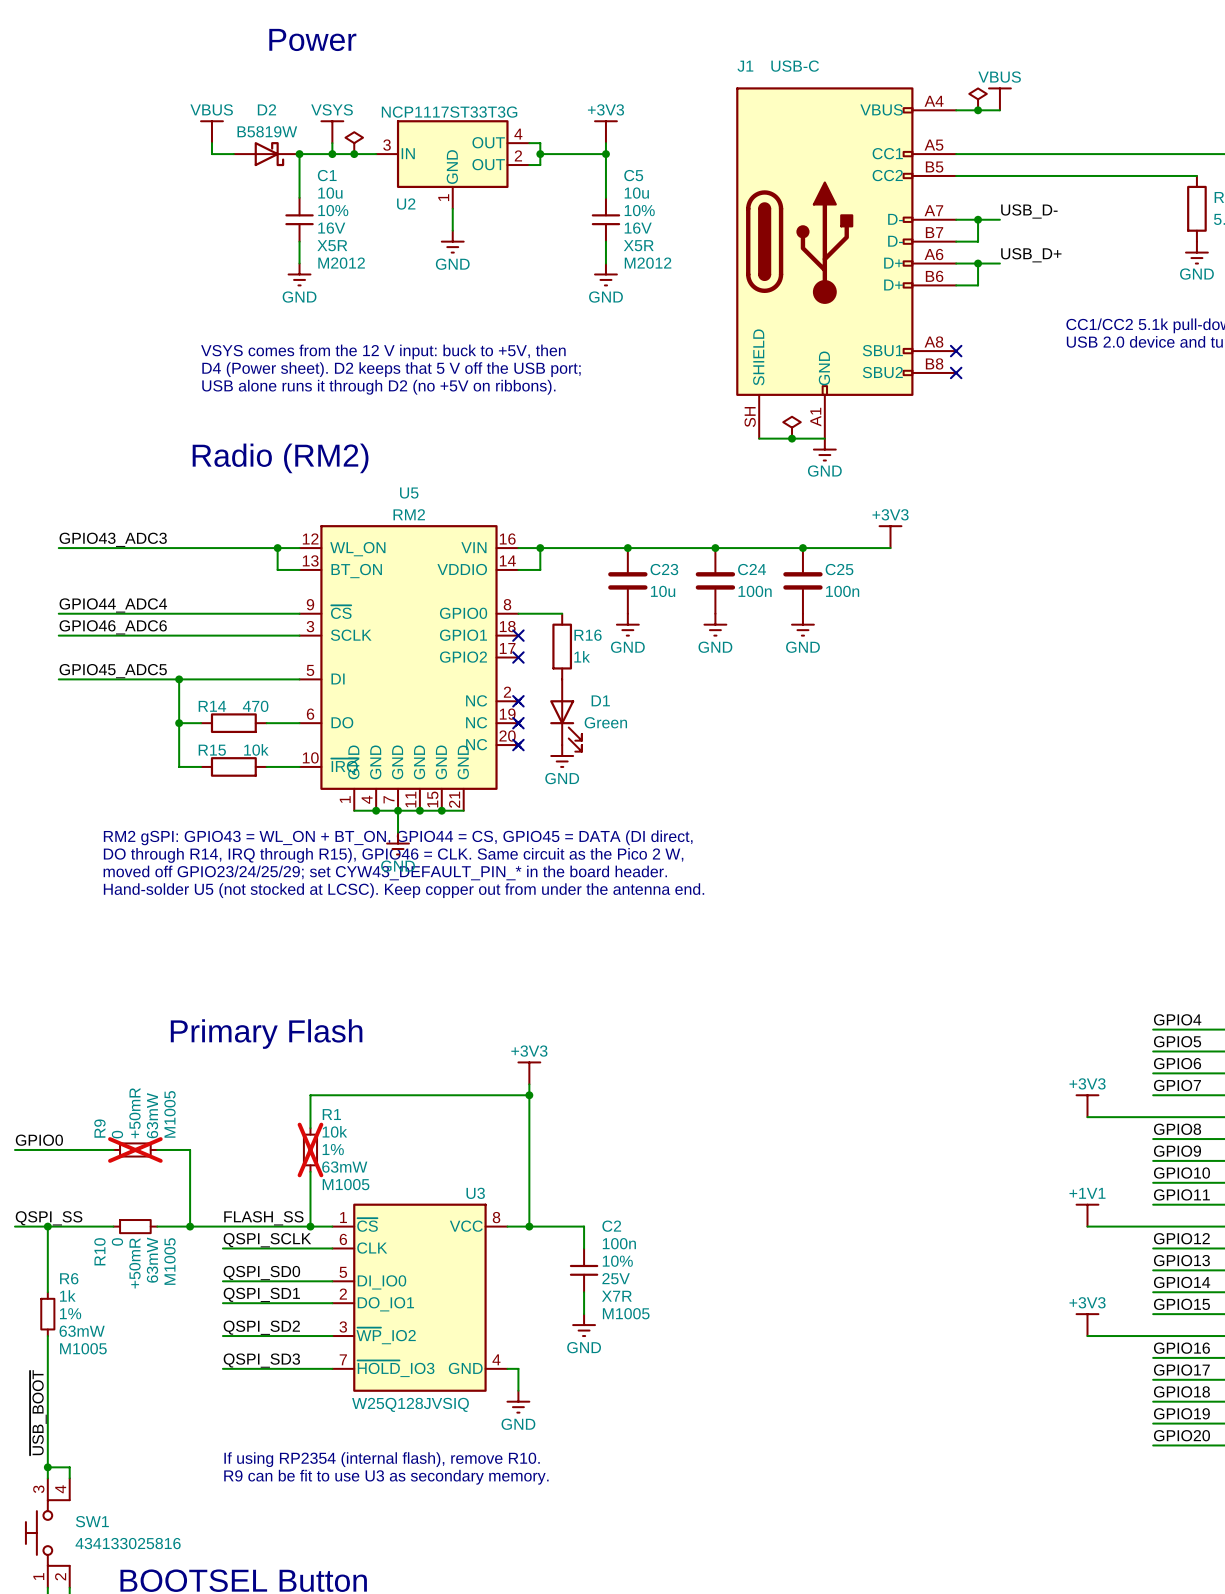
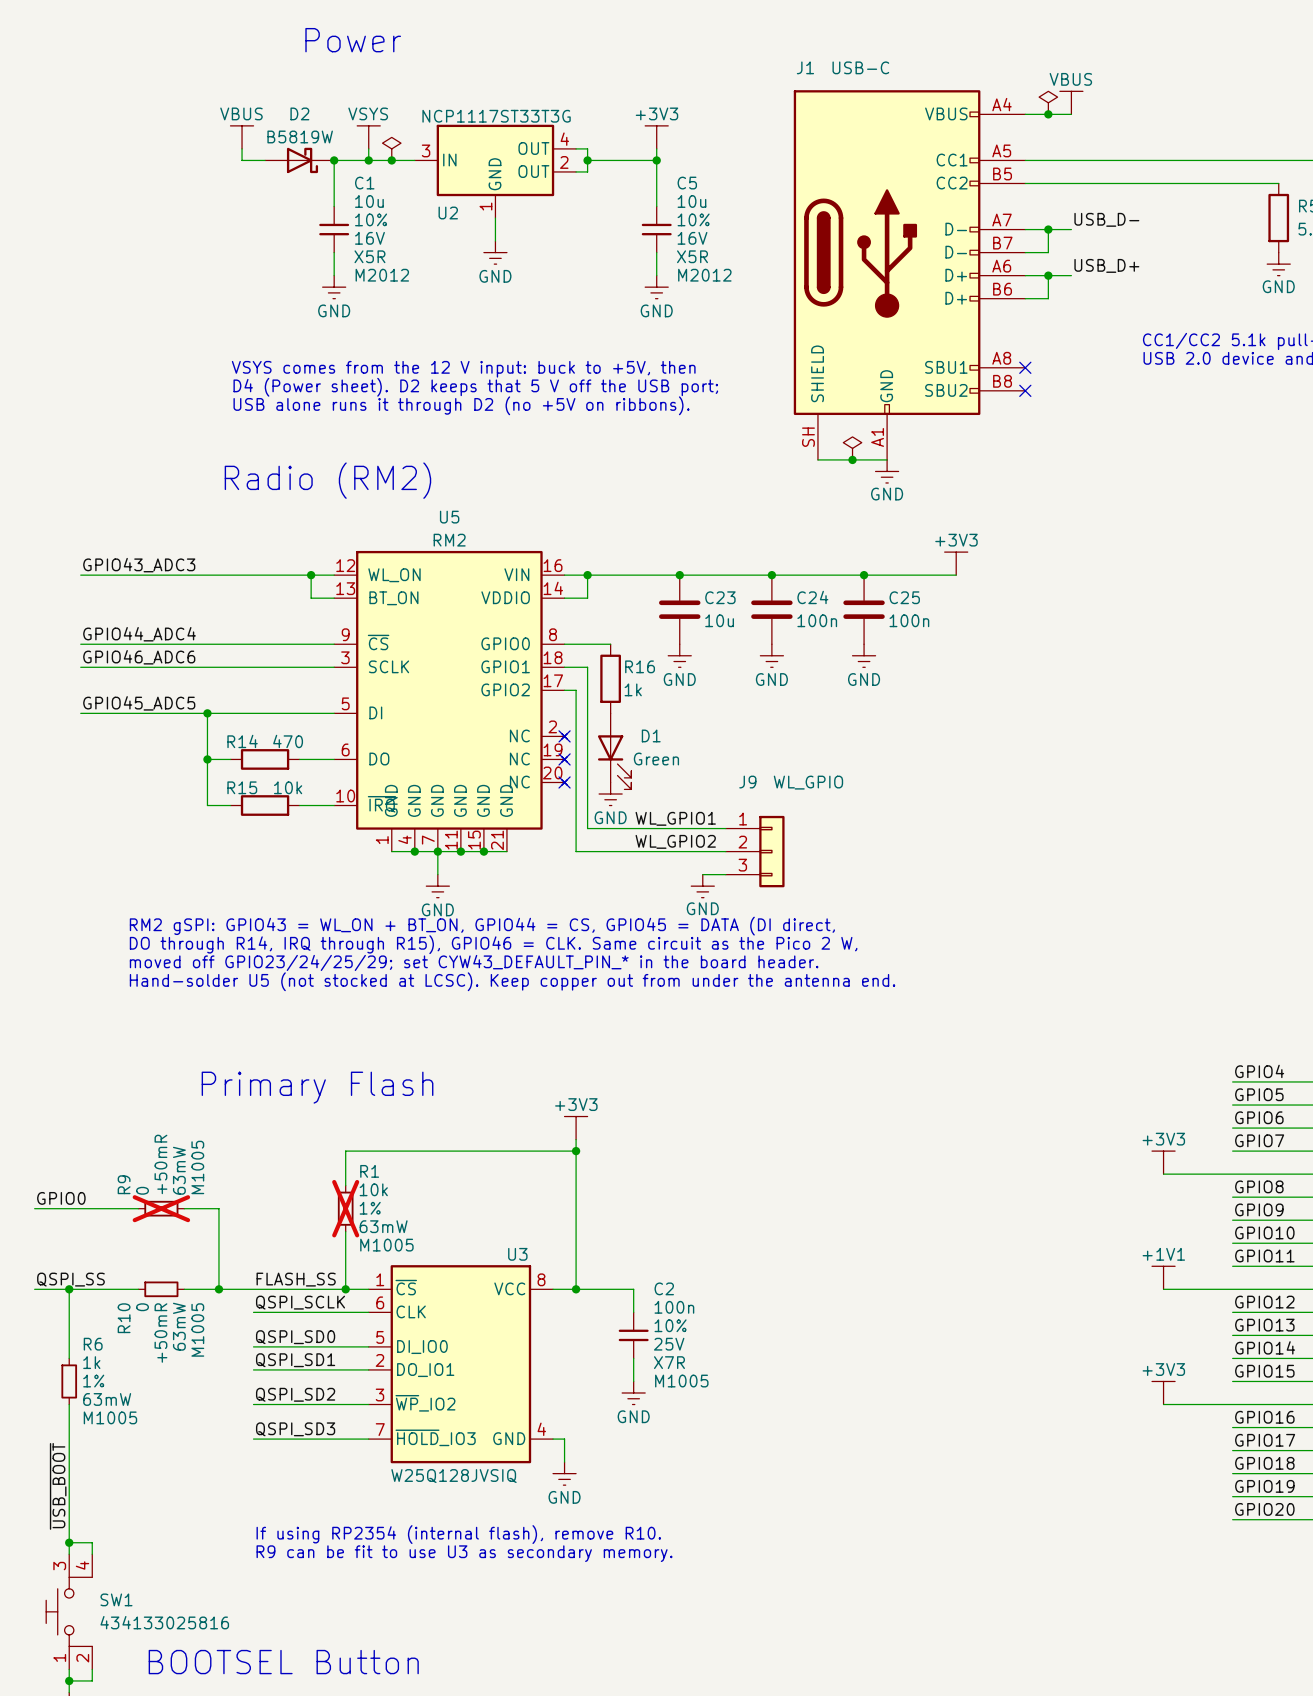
wire: none -> (564, 667) (587, 667) (587, 828) (725, 828)
no-connect mark: (518, 635) -> none
wire: none -> (564, 690) (576, 690) (576, 851) (725, 851)
no-connect mark: (518, 657) -> none
label: none -> WL_GPIO1 (675, 818)
label: none -> WL_GPIO2 (675, 841)
J9: none -> WL_GPIO (755, 851)
wire: none -> (702, 874) (725, 874)
text position: RM2 gSPI: GPIO43 = WL_ON + BT_ON, GPIO44 = CS, GPIO45 = DATA (DI direct, (398, 837) -> RM2 gSPI: GPIO43 = WL_ON + BT_ON, GPIO44 = CS, GPIO45 = DATA (DI direct, (482, 926)
power symbol: none -> GND (702, 886)
text position: DO through R14, IRQ through R15), GPIO46 = CLK. Same circuit as the Pico 2 W, (393, 855) -> DO through R14, IRQ through R15), GPIO46 = CLK. Same circuit as the Pico 2 W, (493, 944)
text position: moved off GPIO23/24/25/29; set CYW43_DEFAULT_PIN_* in the board header. (385, 872) -> moved off GPIO23/24/25/29; set CYW43_DEFAULT_PIN_* in the board header. (474, 962)
text position: Hand-solder U5 (not stocked at LCSC). Keep copper out from under the antenna end. (404, 890) -> Hand-solder U5 (not stocked at LCSC). Keep copper out from under the antenna end. (512, 981)

